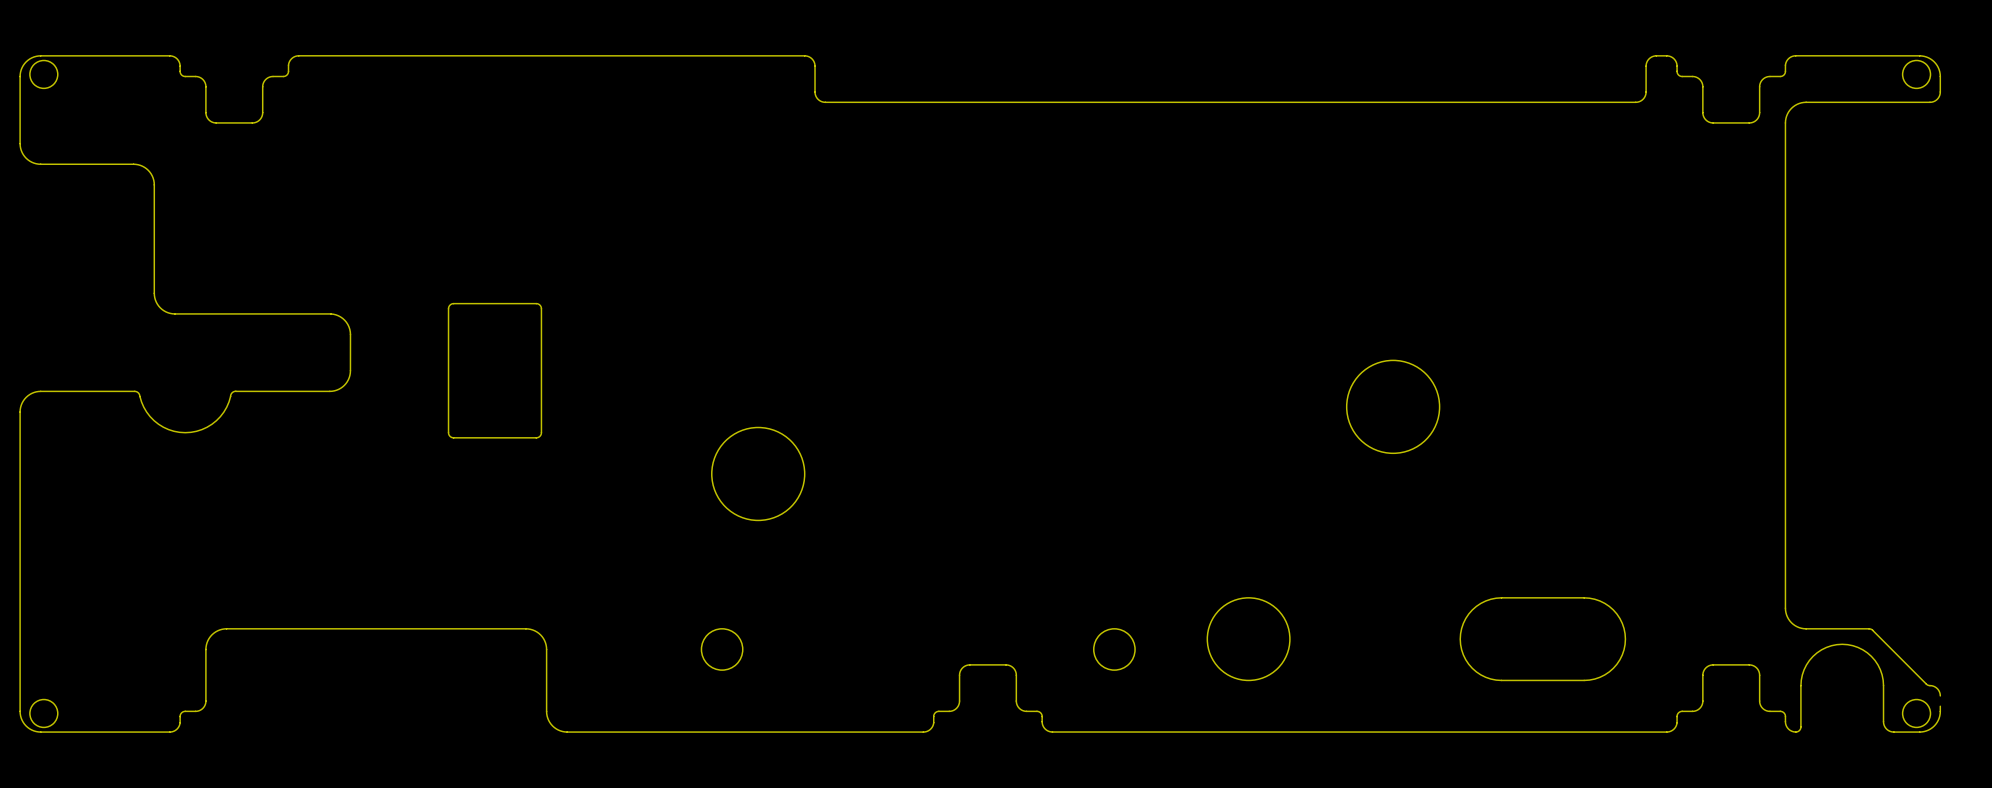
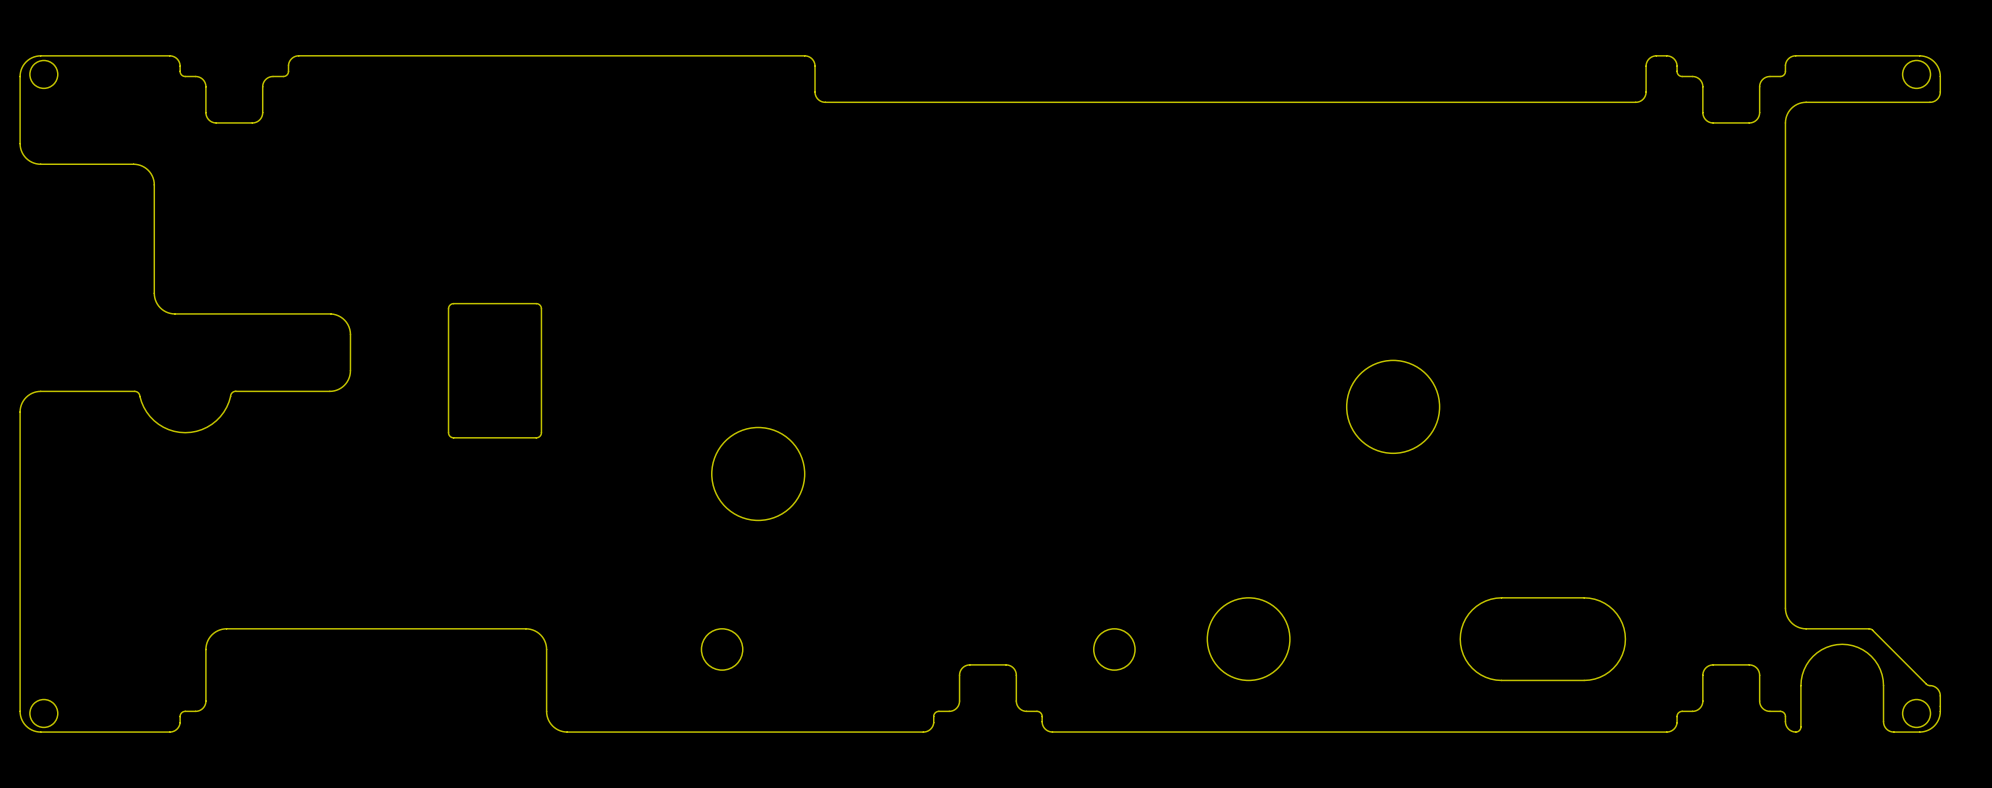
board edge: none -> (1940, 695) (1940, 706)

